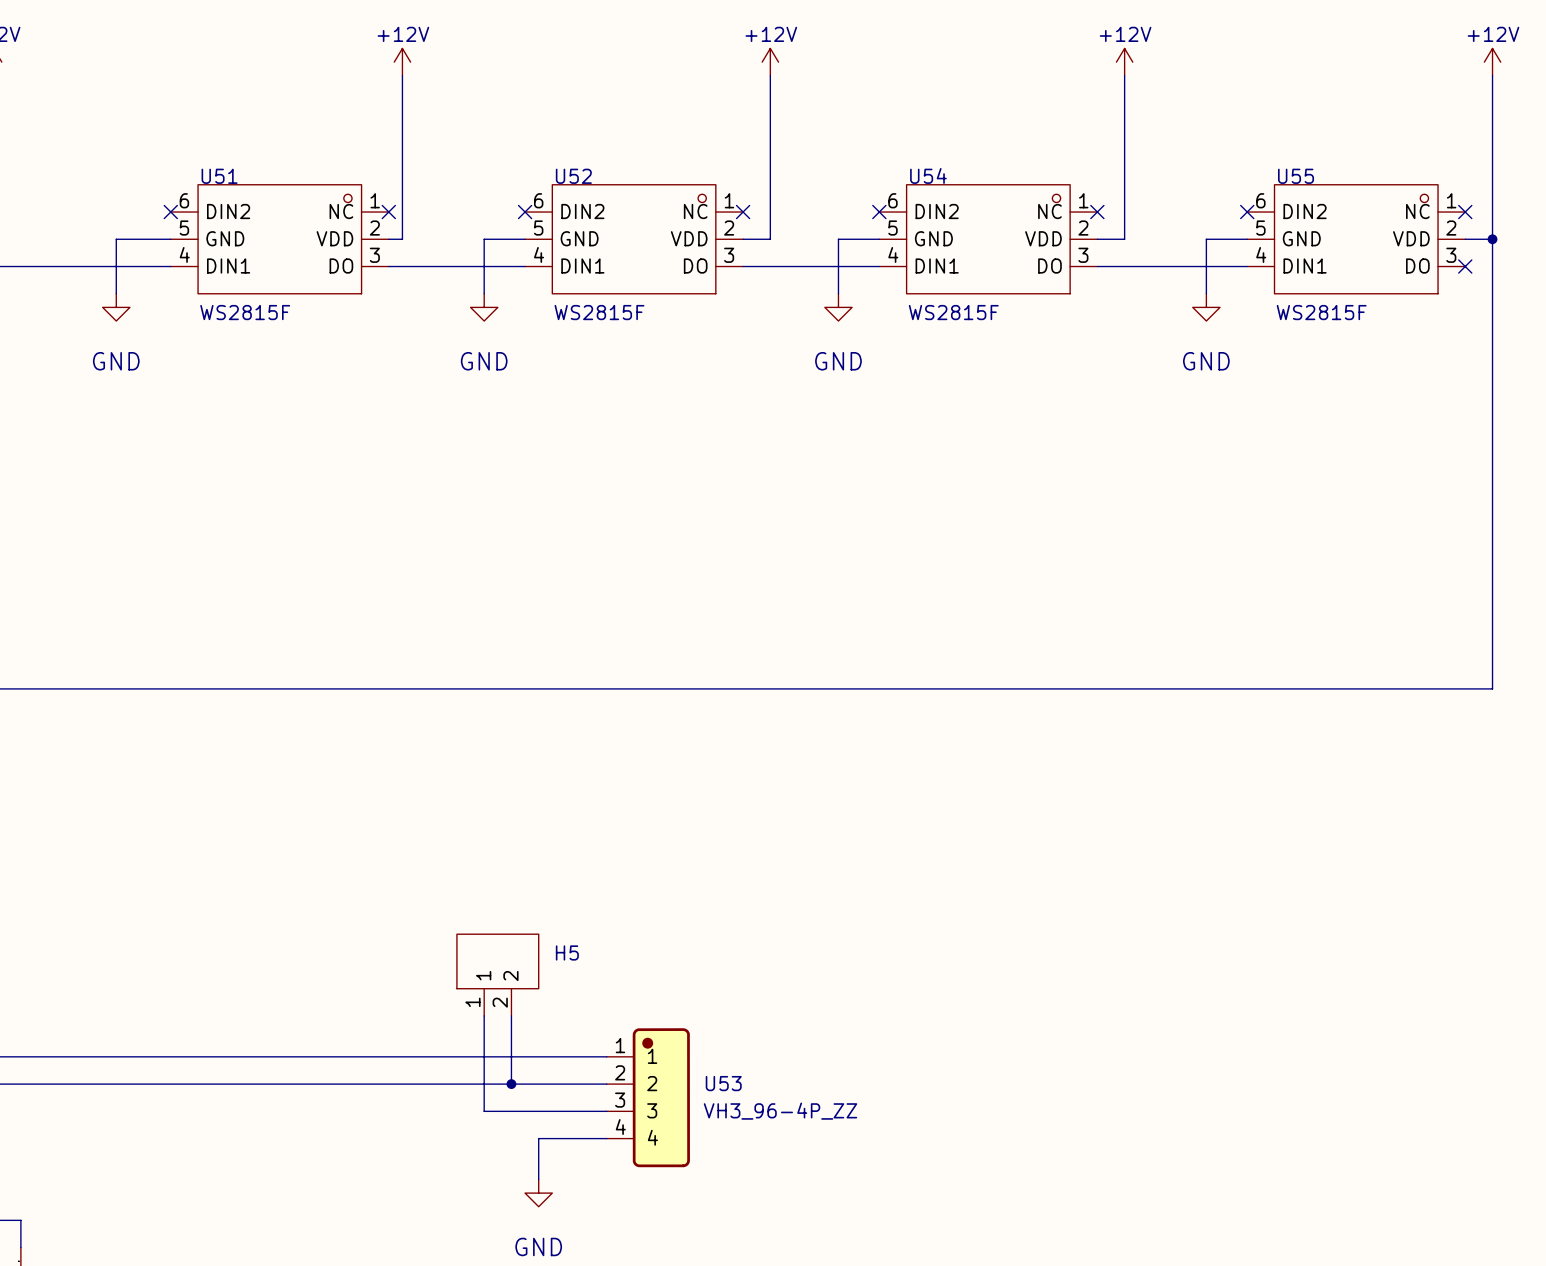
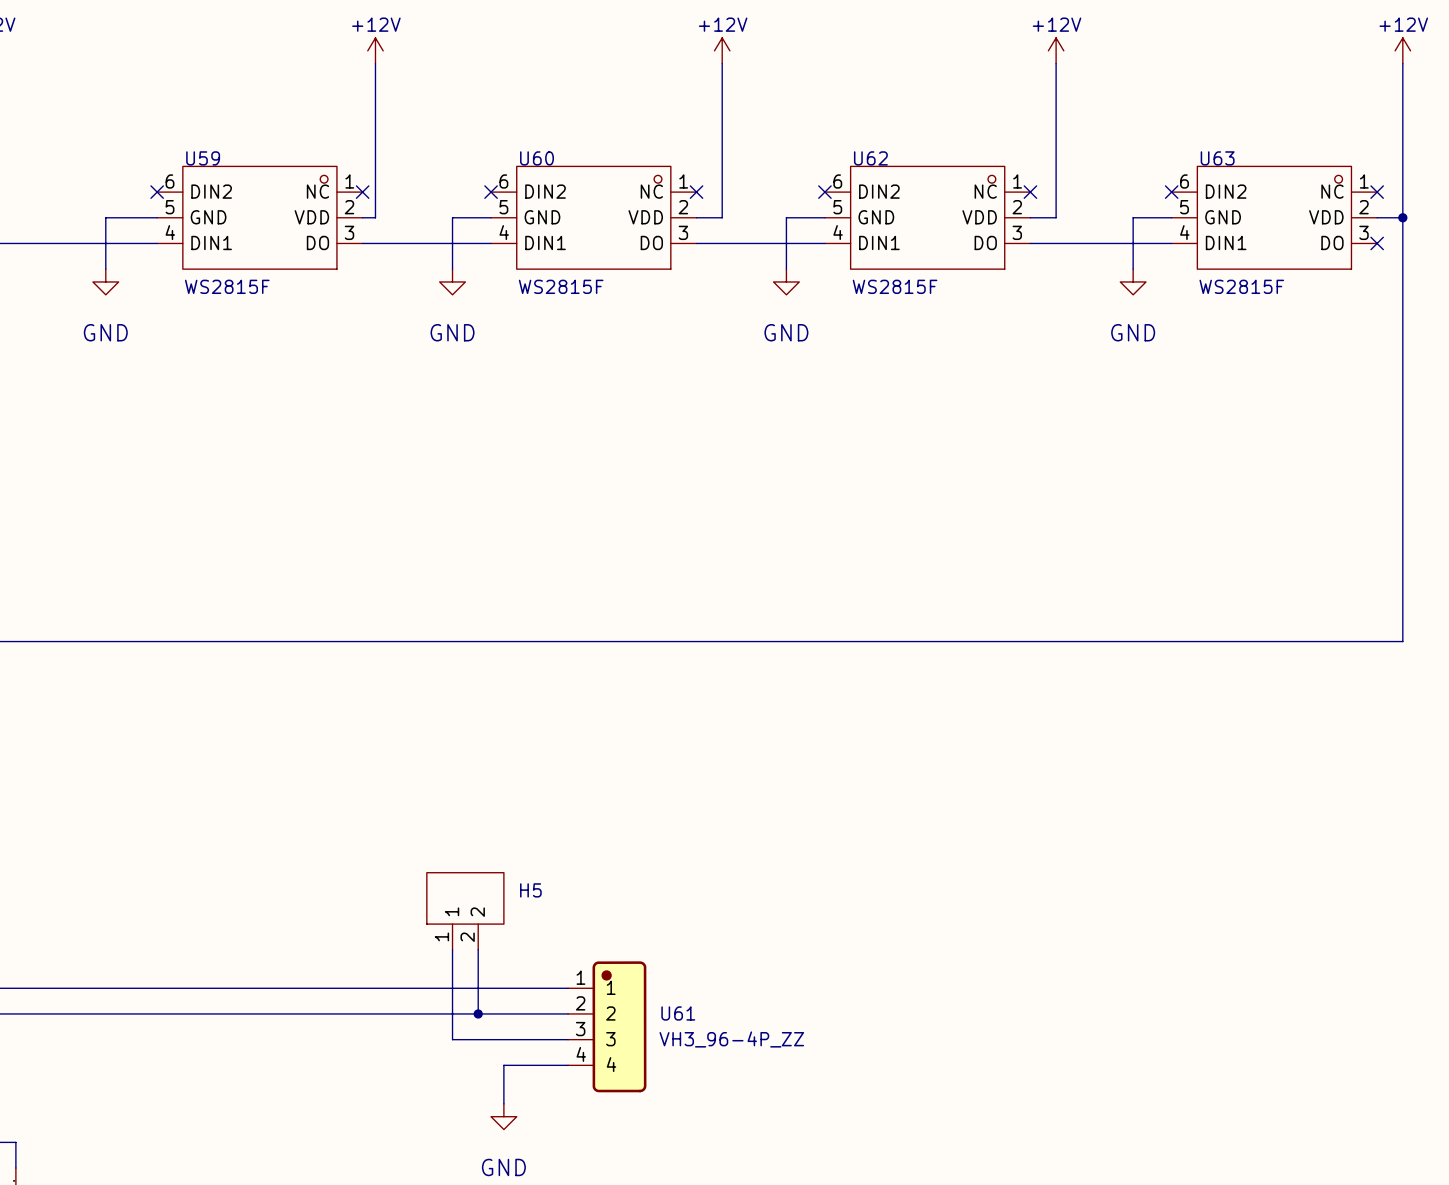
U54 name: U54 (928, 175) -> U62 (870, 158)
U51 name: U51 (219, 176) -> U59 (203, 158)
U52 name: U52 (573, 176) -> U60 (537, 158)
U55 name: U55 (1296, 176) -> U63 (1217, 158)
U53 name: U53 (723, 1083) -> U61 (678, 1013)

